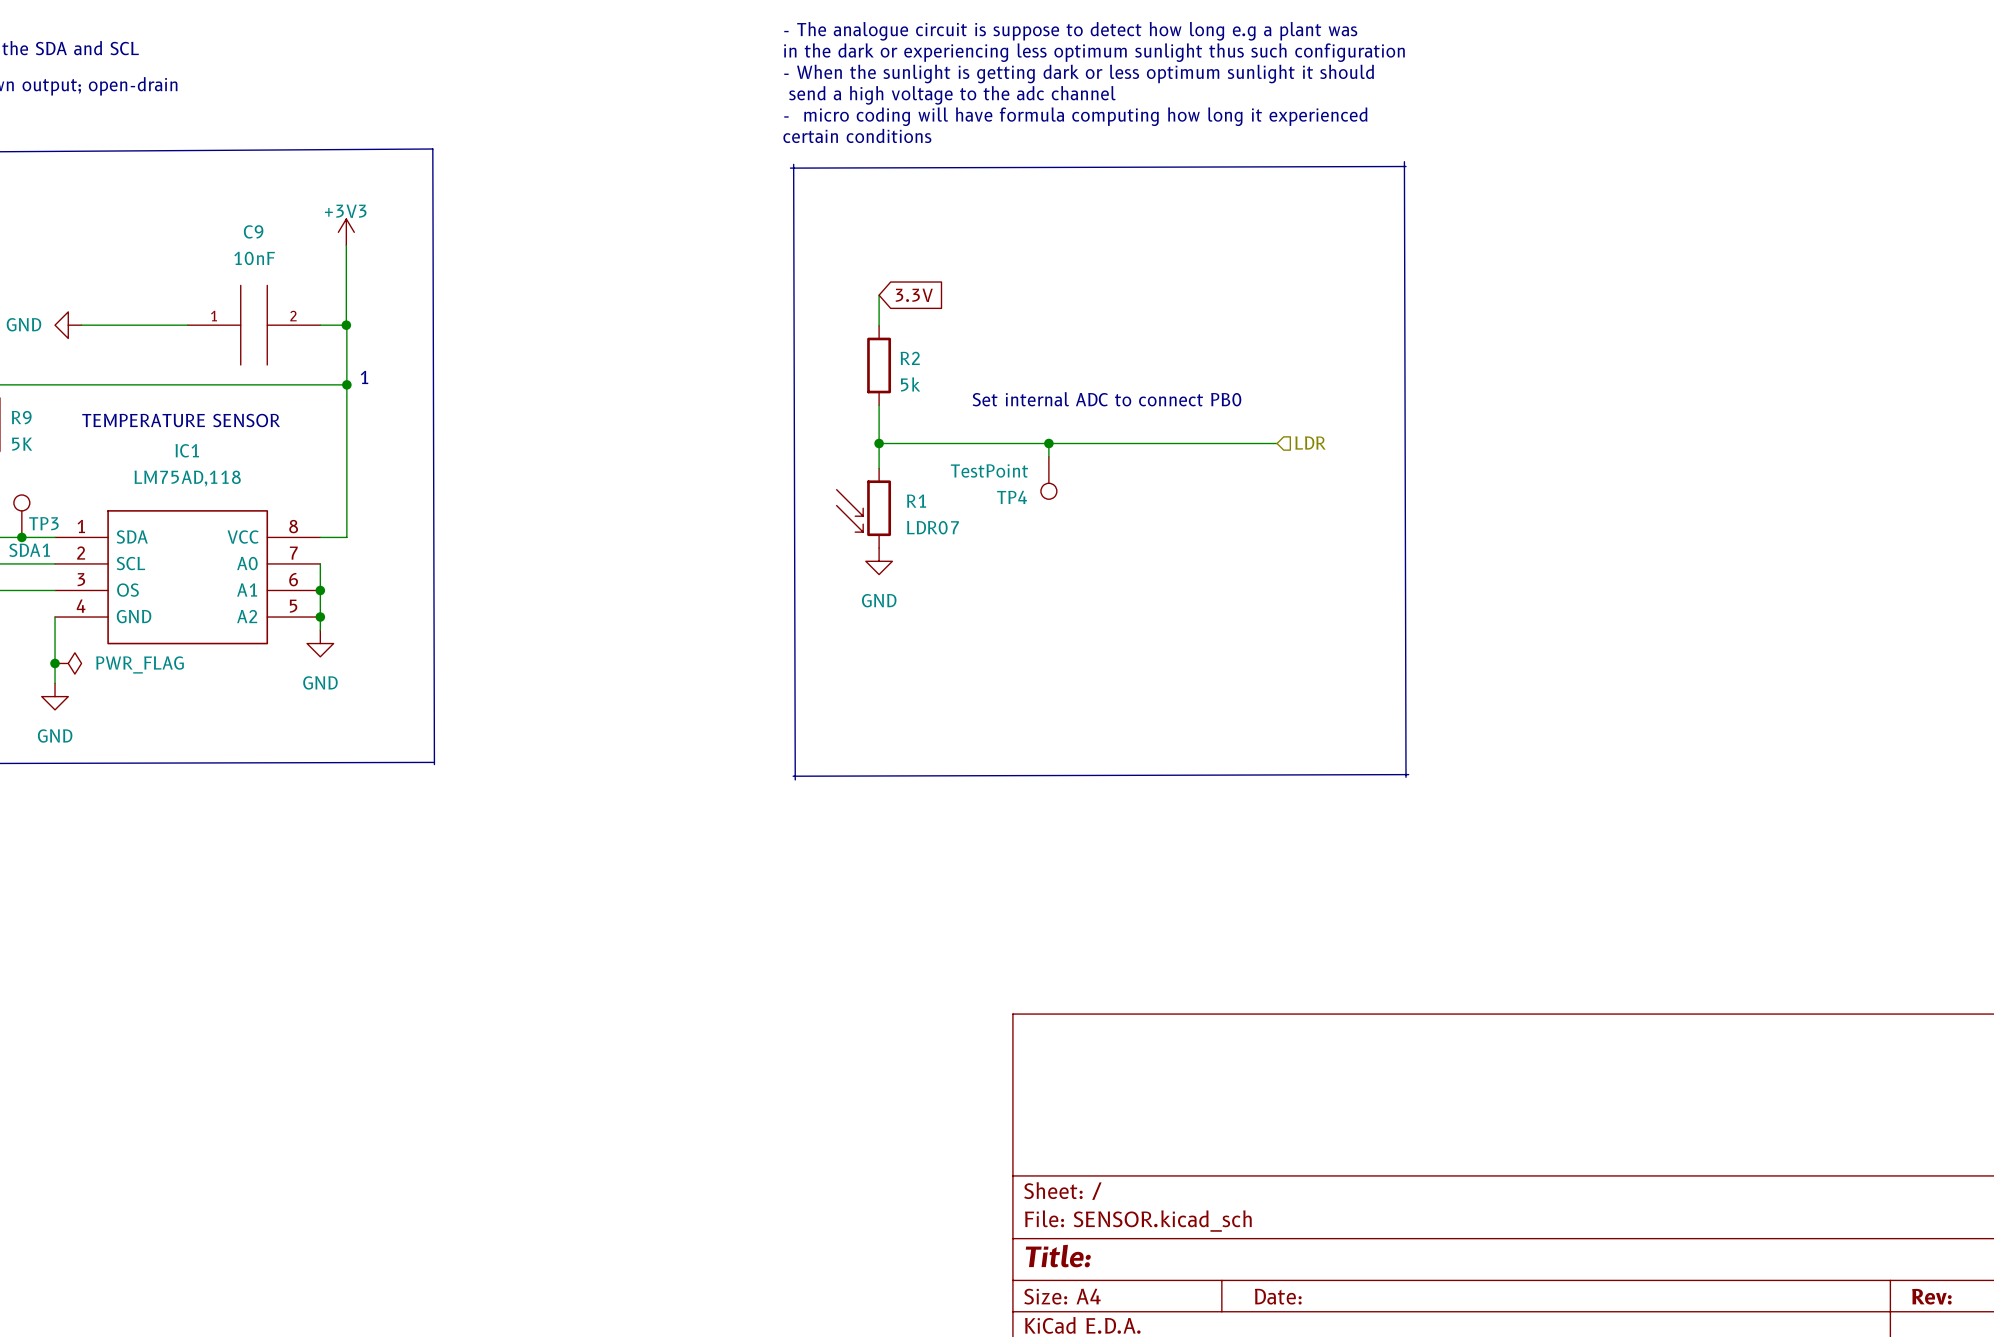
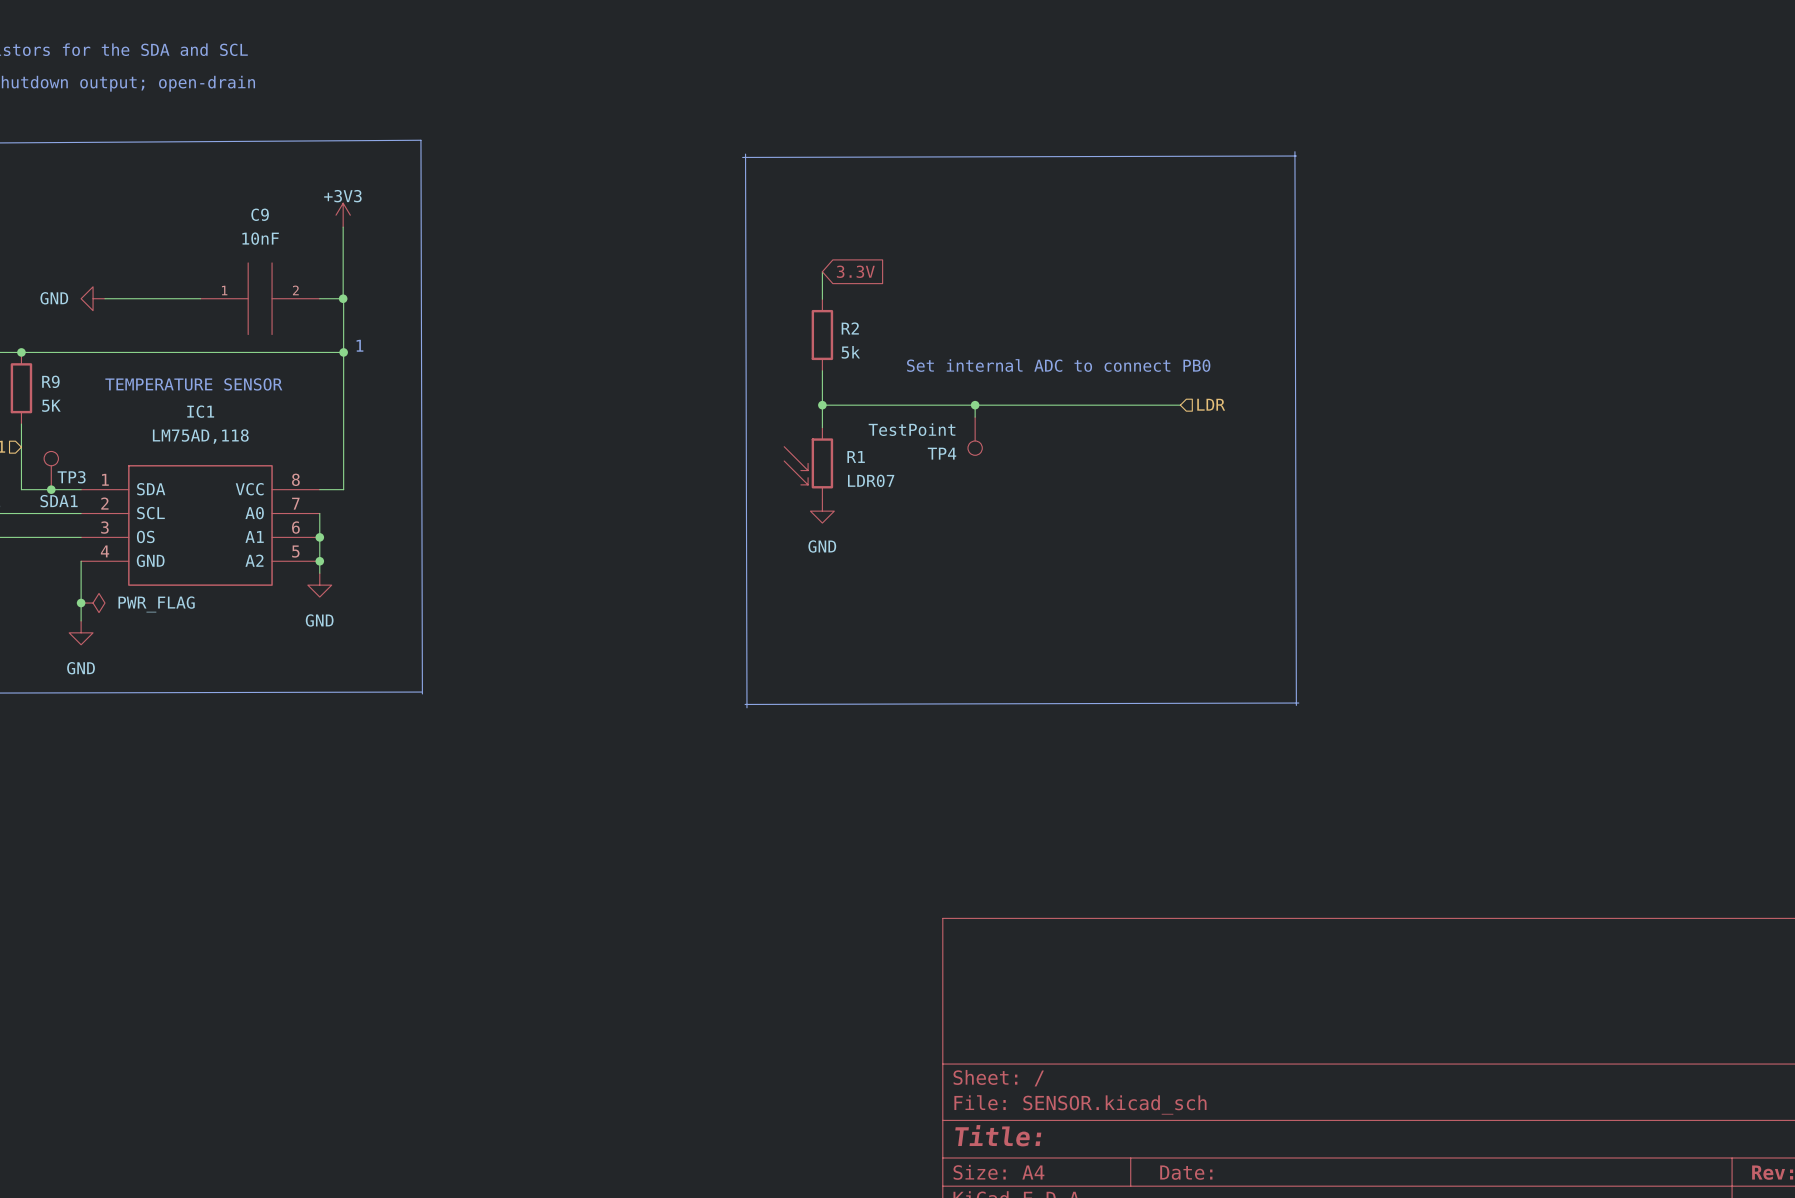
text: - The analogue circuit is suppose to detect how long e.g a plant was (1070, 31) -> none
text: in the dark or experiencing less optimum sunlight thus such configuration (1094, 52) -> none
text: - When the sunlight is getting dark or less optimum sunlight it should (1079, 74) -> none
text: send a high voltage to the adc channel (952, 95) -> none
text: - micro coding will have formula computing how long it experienced (1075, 116) -> none
text: certain conditions (857, 135) -> none

